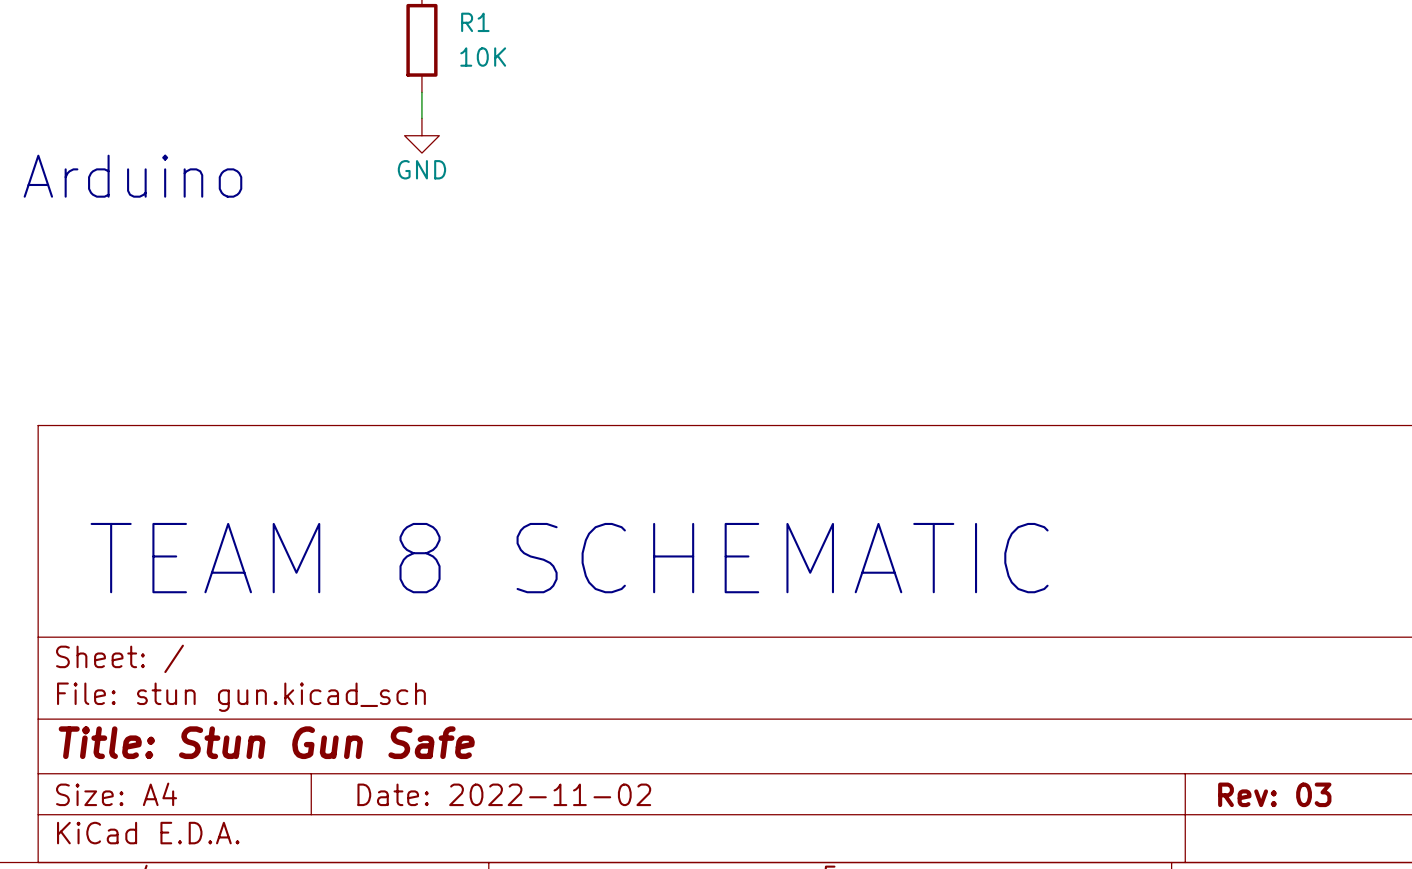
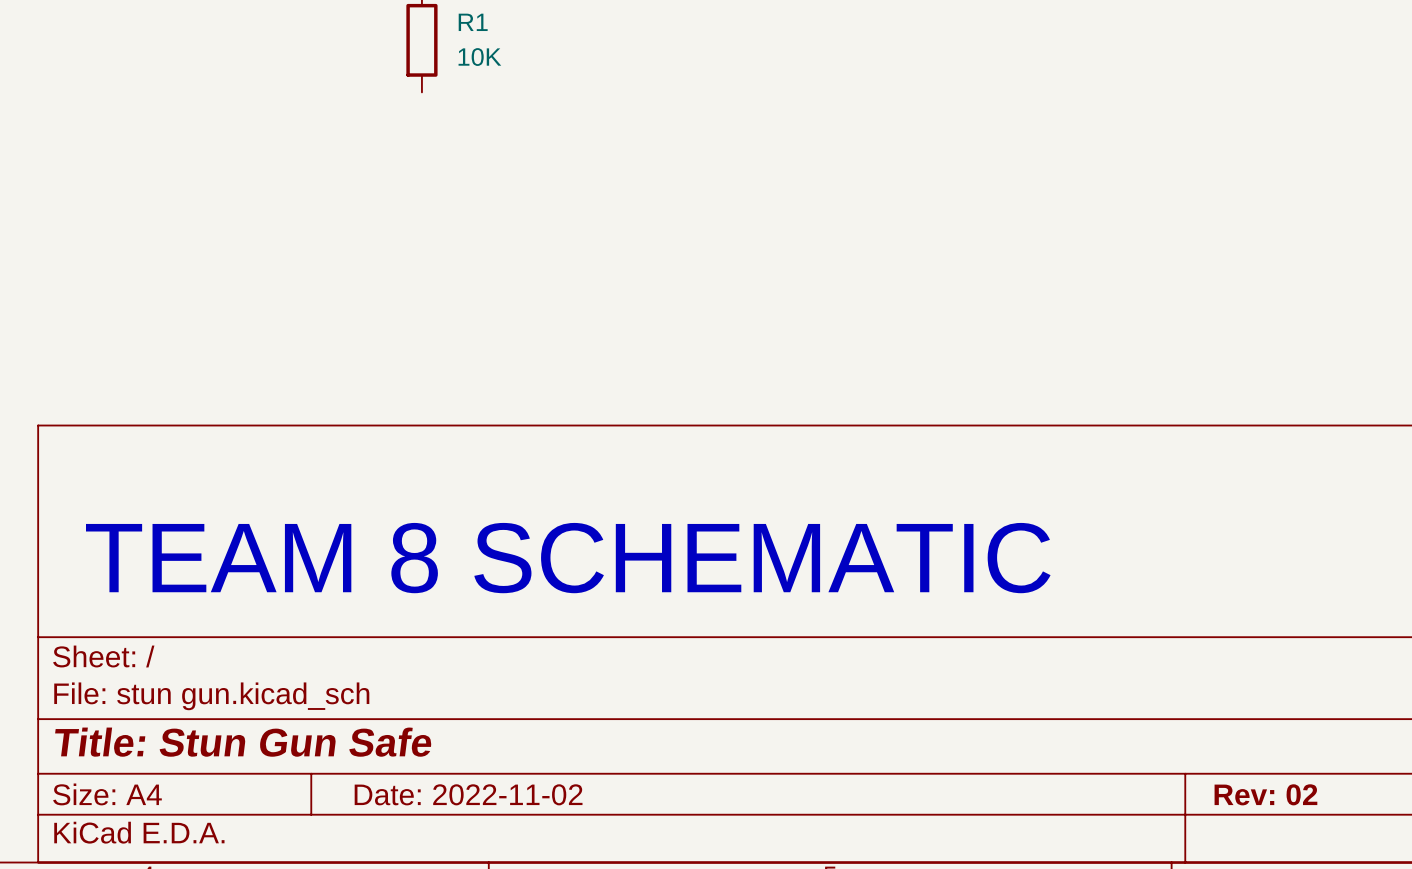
wire: (421, 92) (421, 118) -> none
power symbol: GND (421, 135) -> none
title block: Rev: 03 (1274, 794) -> Rev: 02 (1265, 794)

